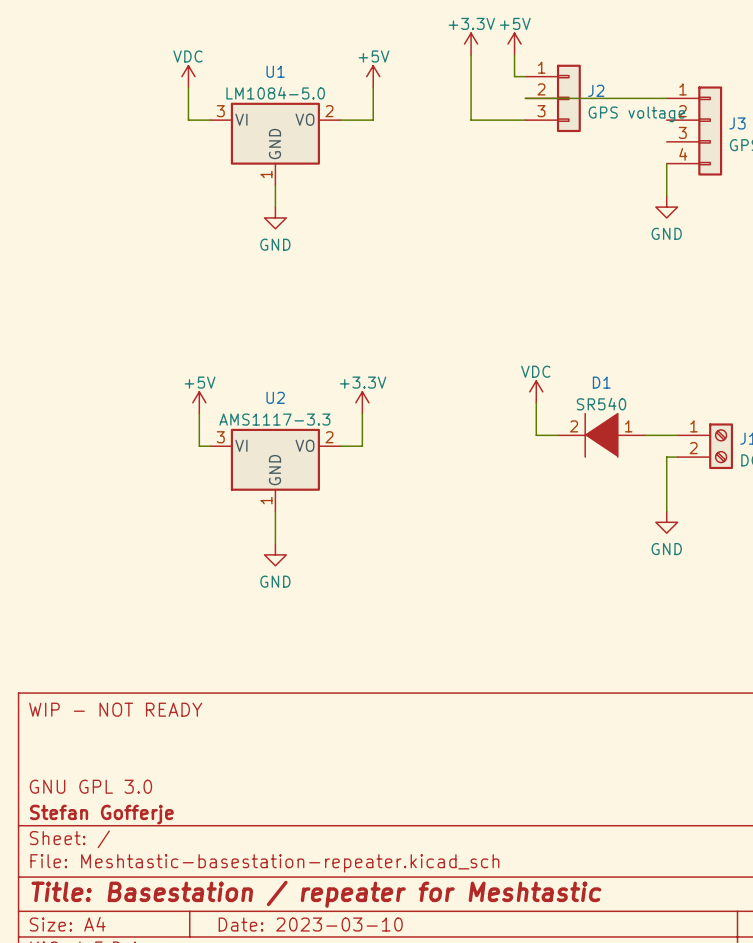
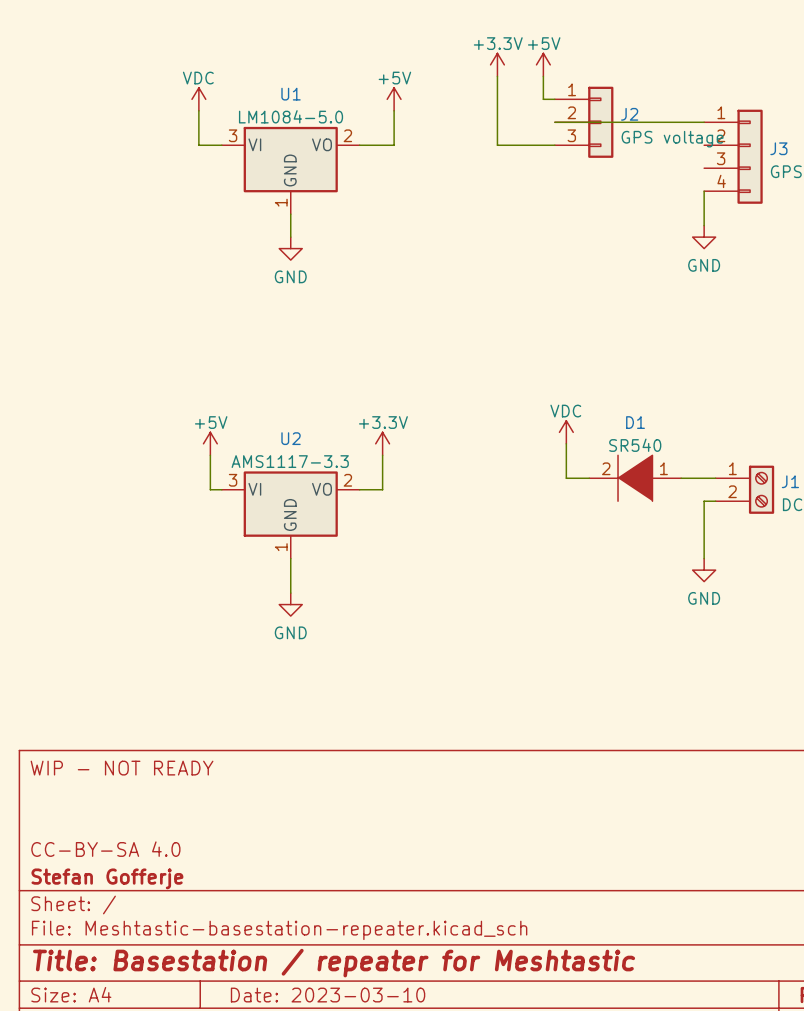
title block: GNU GPL 3.0 (90, 786) -> CC-BY-SA 4.0 (105, 849)

